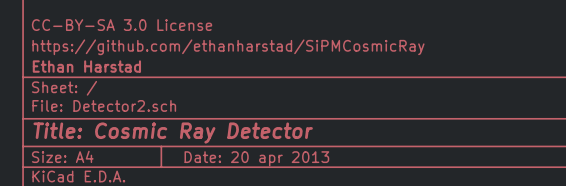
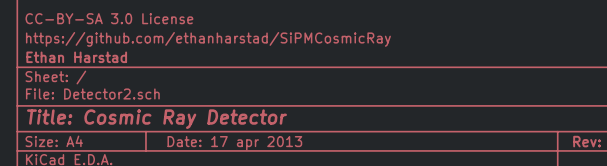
title block: Date: 20 apr 2013 (256, 158) -> Date: 17 apr 2013 (234, 143)

